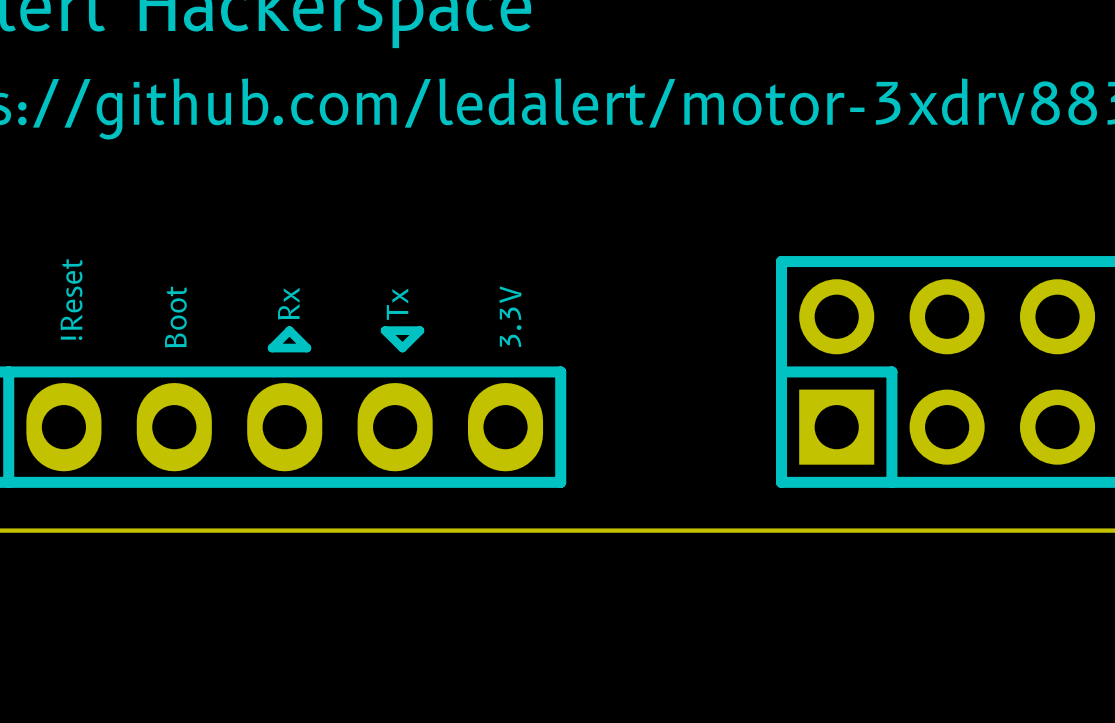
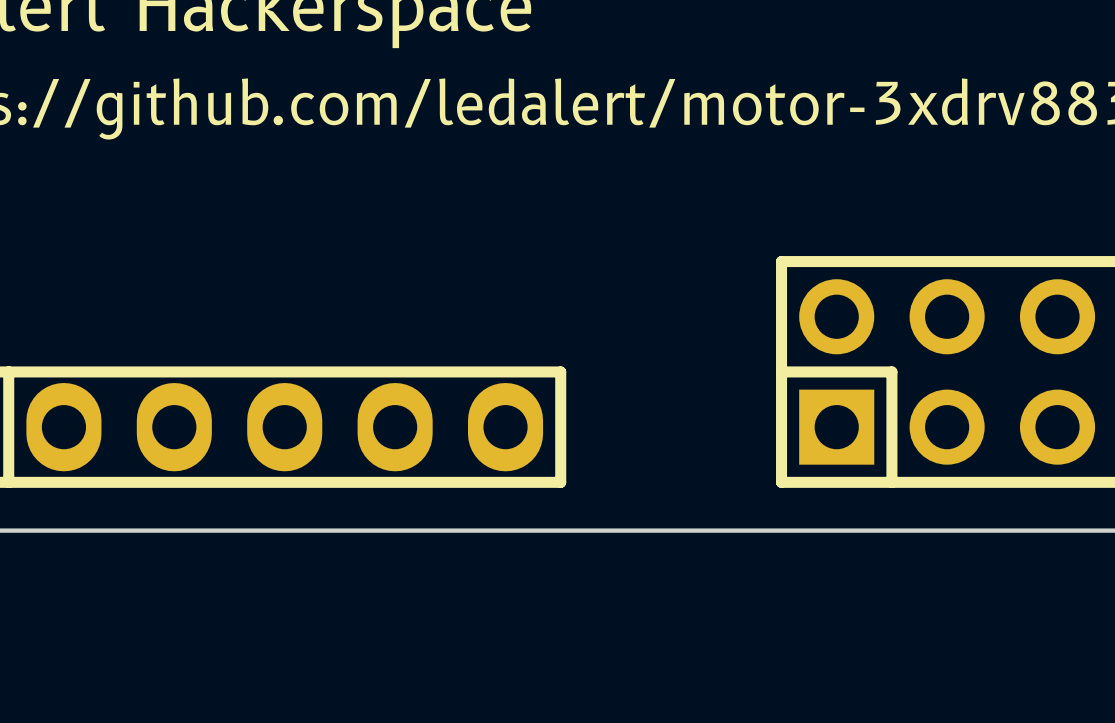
text: !Reset (71, 299) -> none
text: Rx (288, 303) -> none
text: Tx (397, 304) -> none
text: 3.3V (510, 316) -> none
text: Boot (175, 317) -> none
line: (289, 330) (306, 348) (272, 348) (289, 330) -> none
line: (385, 330) (402, 348) (419, 330) (385, 330) -> none

